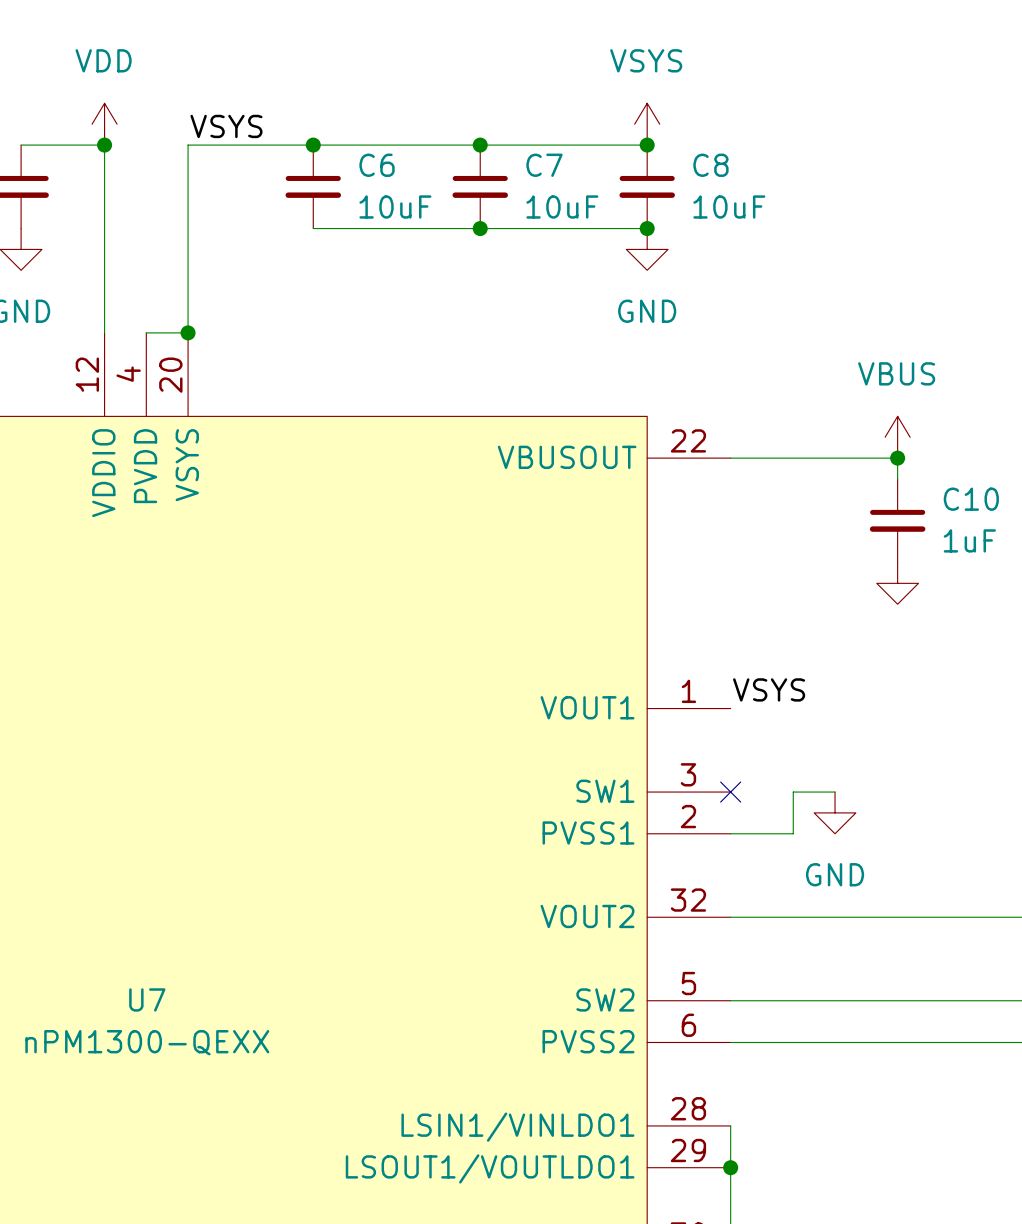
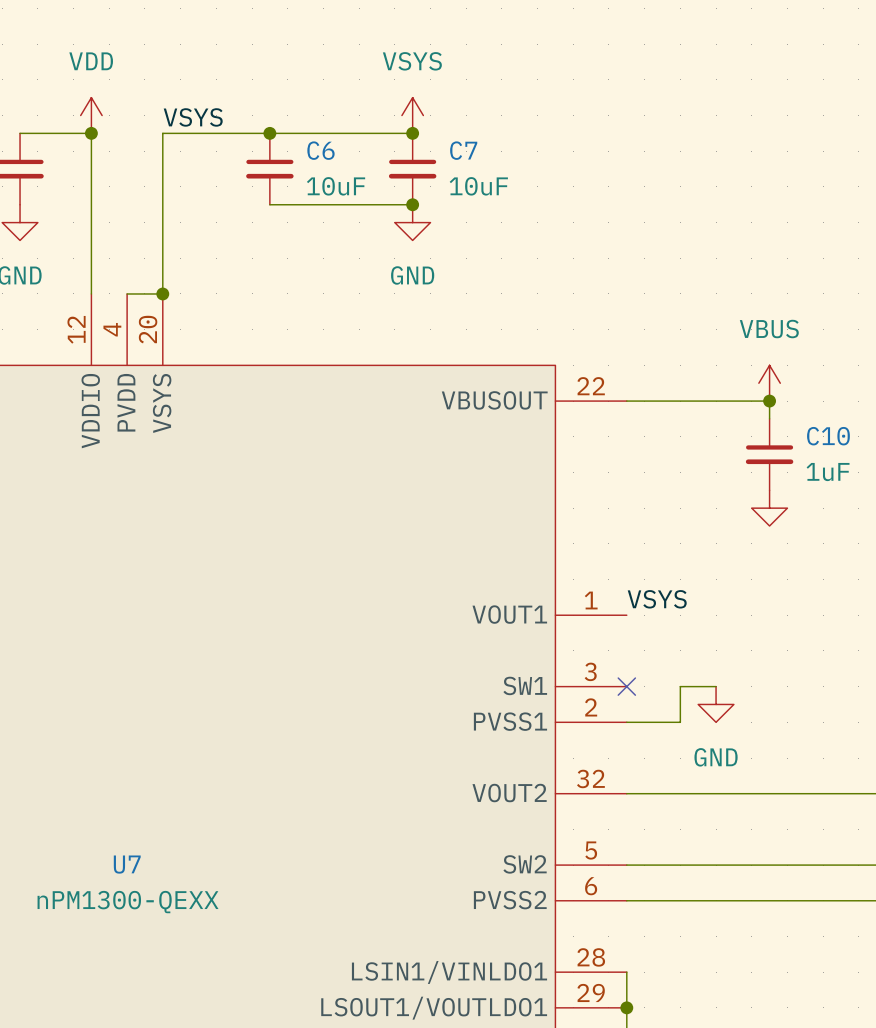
power symbol position: VSYS (647, 124) -> VSYS (412, 115)
wire: (480, 145) (647, 145) -> none
junction: (647, 145) -> none
C8: 10uF (647, 186) -> none
wire: (480, 228) (647, 228) -> none
junction: (647, 228) -> none
power symbol position: GND (647, 249) -> GND (412, 222)

